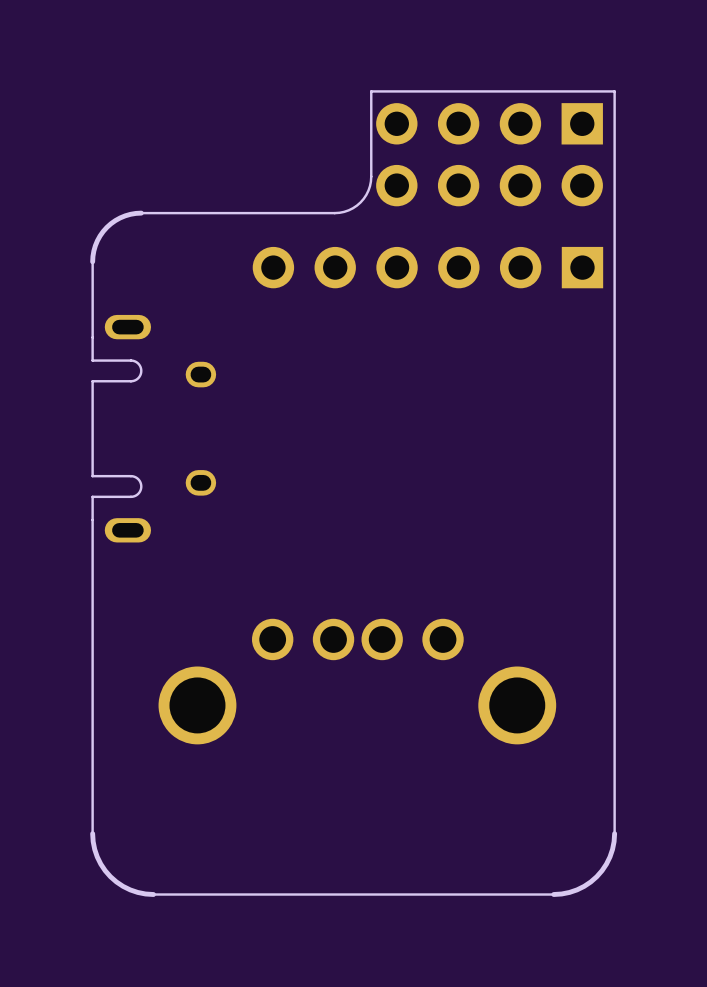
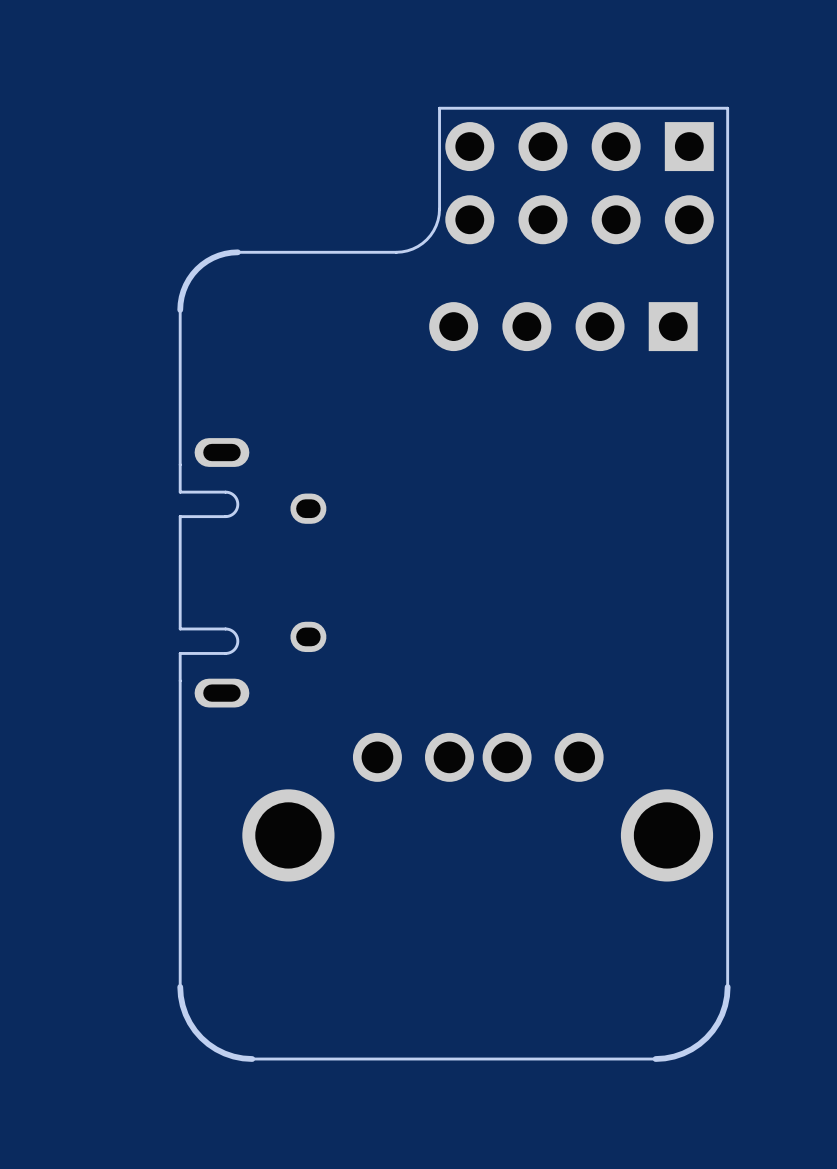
board edge: (200, 213) (130, 214) (115, 220) (103, 231) (95, 245) (92, 256) (92, 337) -> (237, 252) (218, 255) (201, 264) (189, 279) (181, 297) (180, 464)
part: (427, 267) -> none
part: none -> (563, 326)
part position: (153, 428) -> (252, 572)
board edge: (92, 519) (92, 833) (94, 849) (100, 864) (110, 876) (130, 889) (153, 894) (213, 894) -> (180, 680) (180, 996) (189, 1023) (208, 1044) (233, 1056) (252, 1059)
part position: (357, 681) -> (477, 807)

